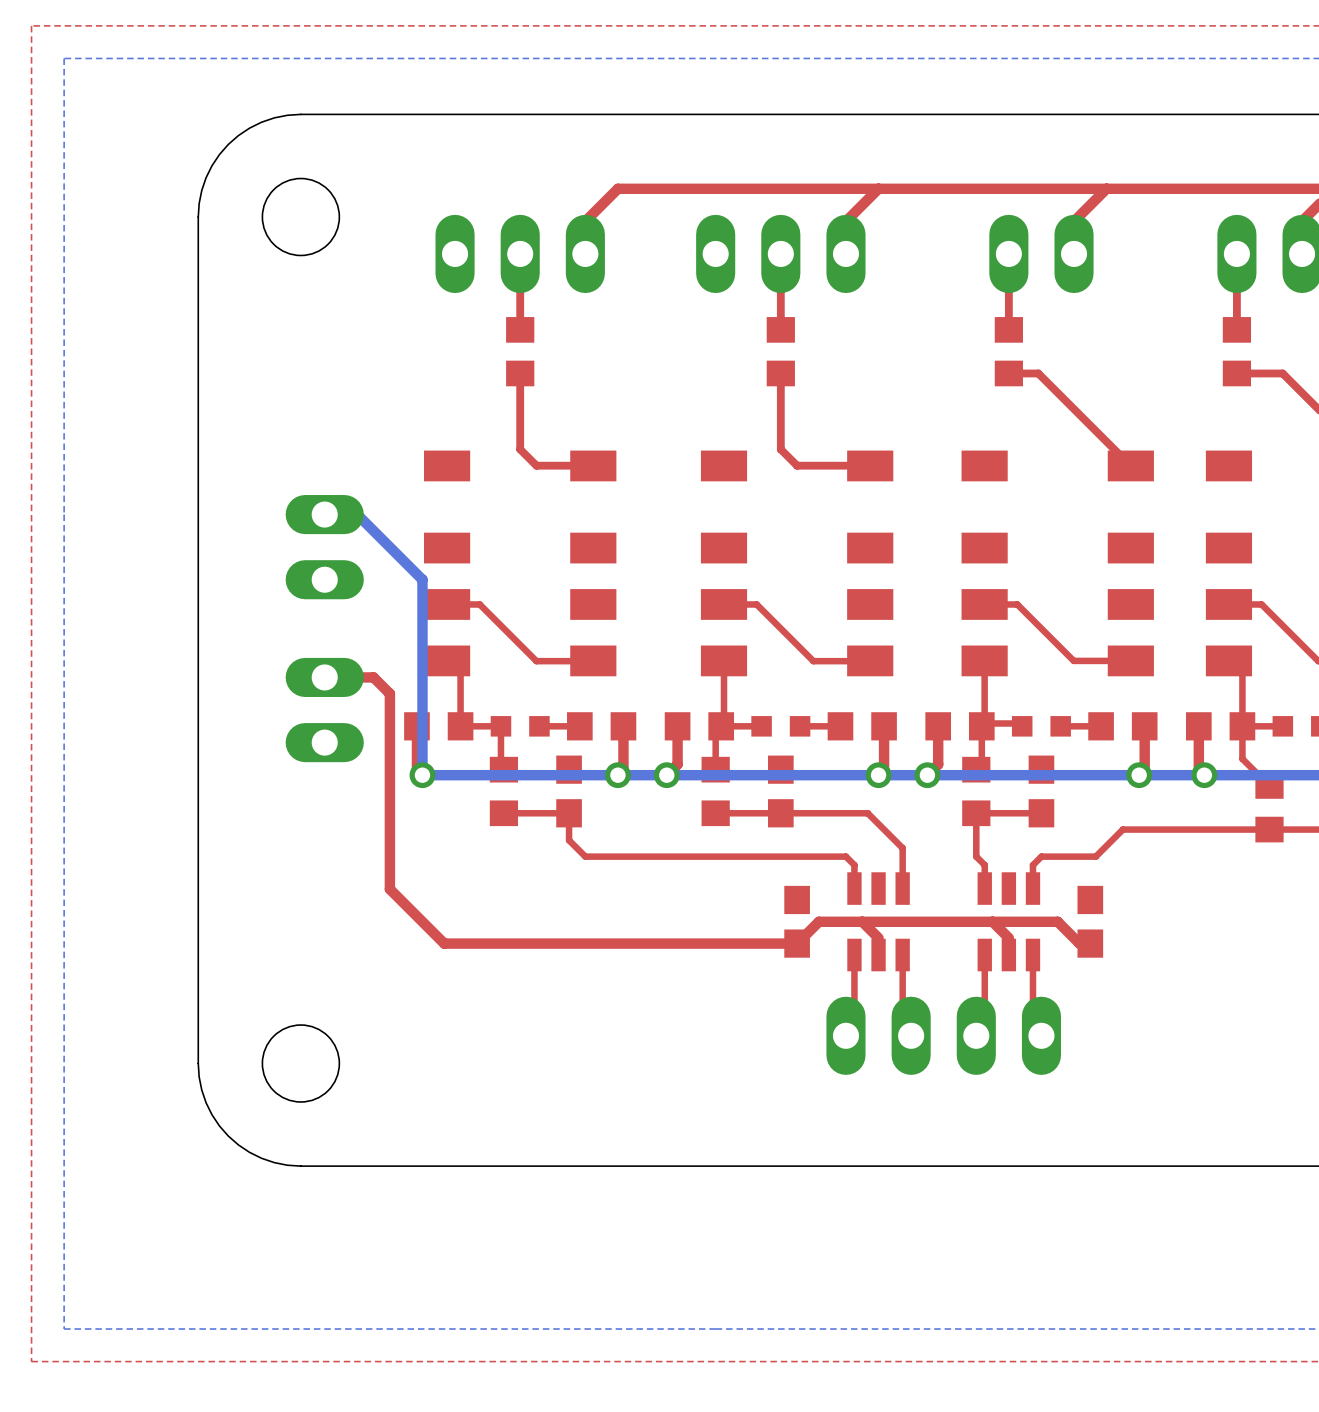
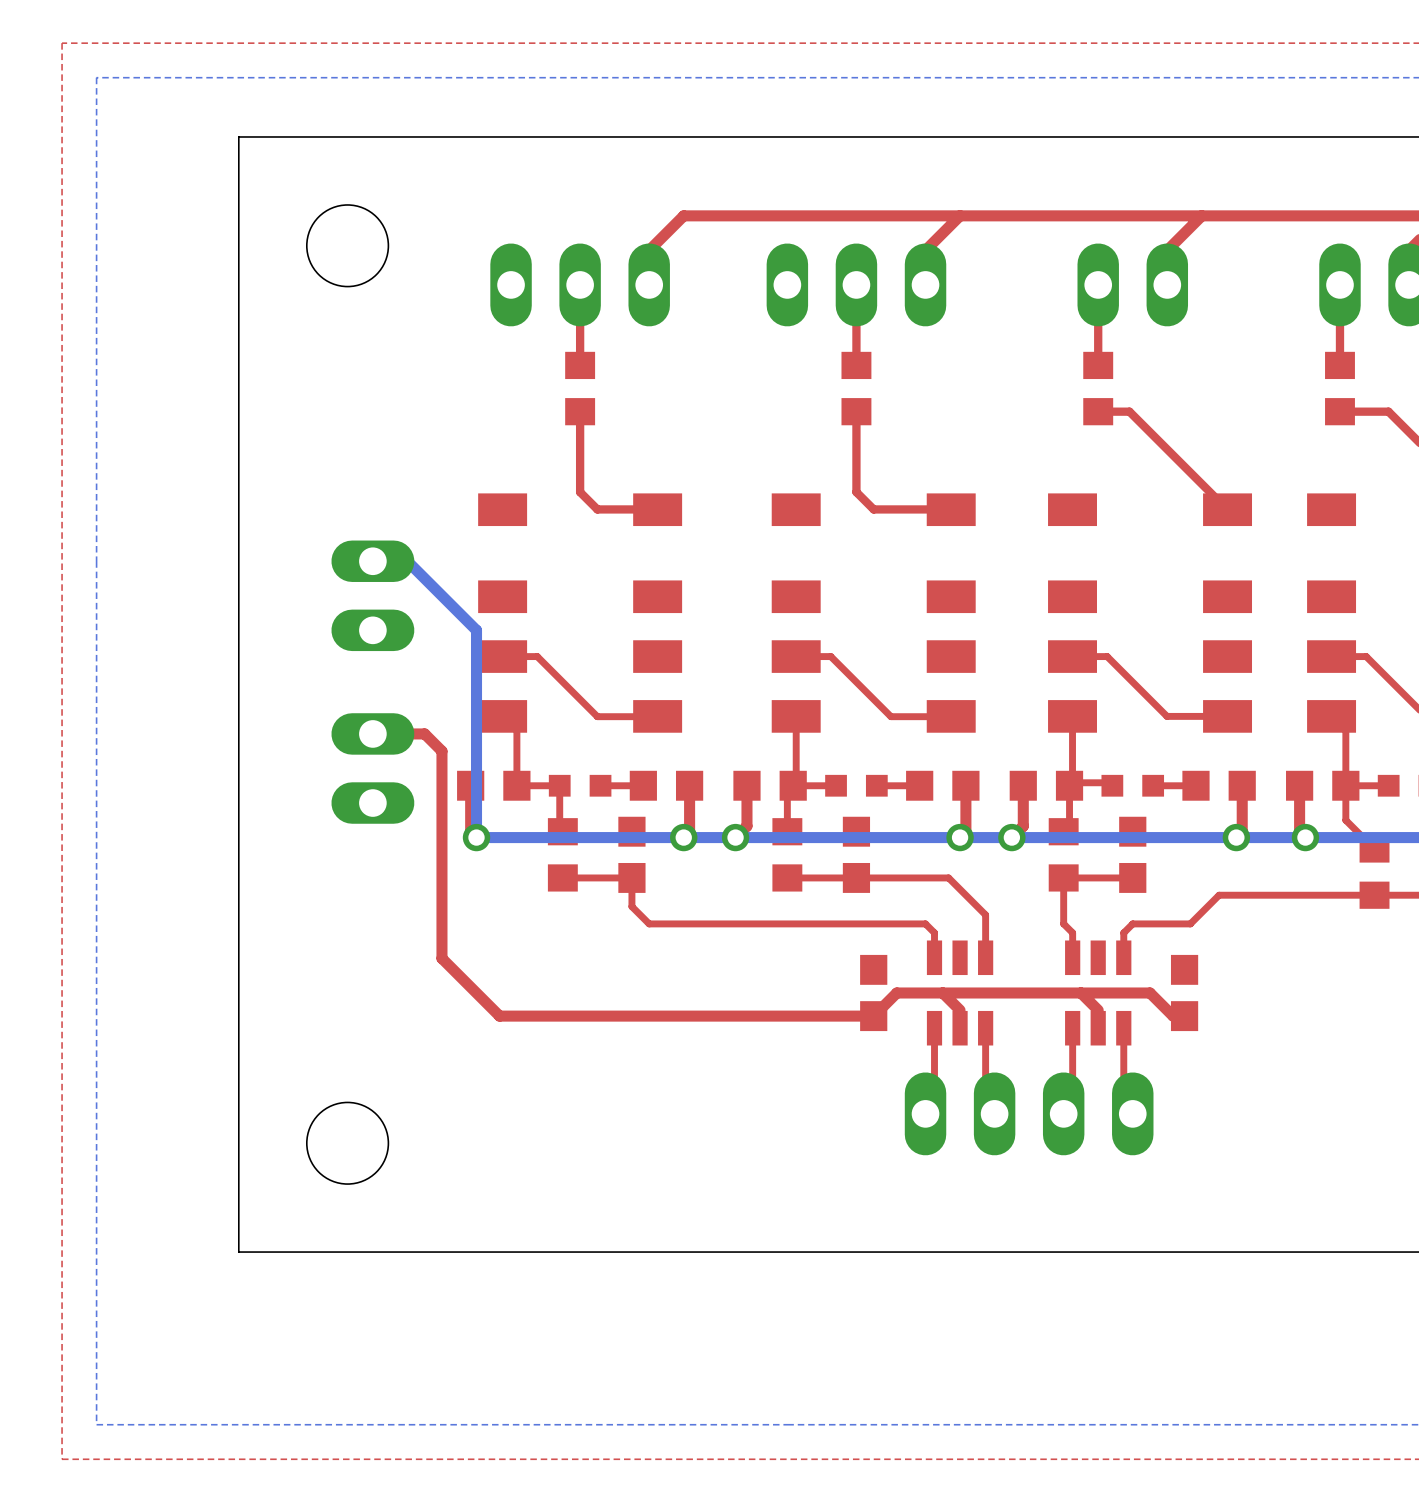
board edge: (300, 114) (287, 115) (261, 122) (249, 128) (228, 144) (212, 165) (206, 177) (199, 203) (198, 217) -> (347, 136) (238, 136) (238, 245)
board edge: (198, 1063) (199, 1076) (206, 1102) (212, 1114) (228, 1136) (249, 1152) (261, 1158) (287, 1165) (300, 1166) -> (238, 1143) (238, 1252) (347, 1252)

